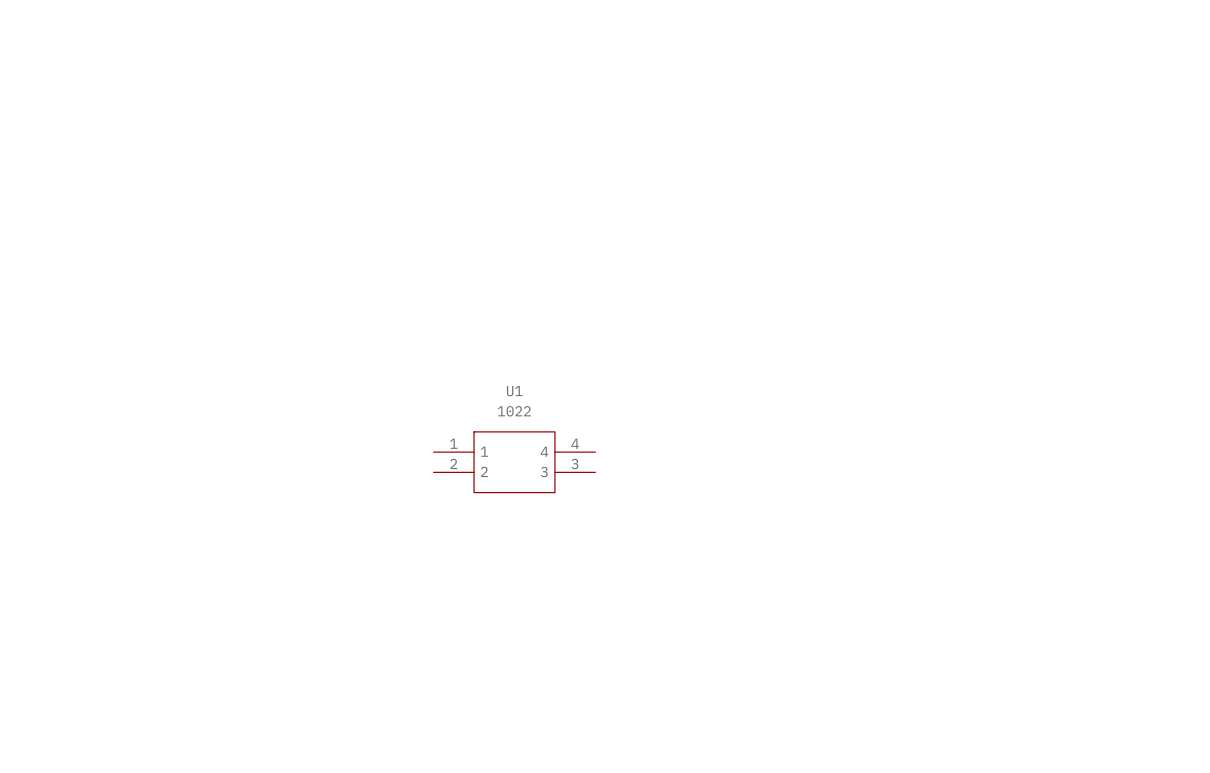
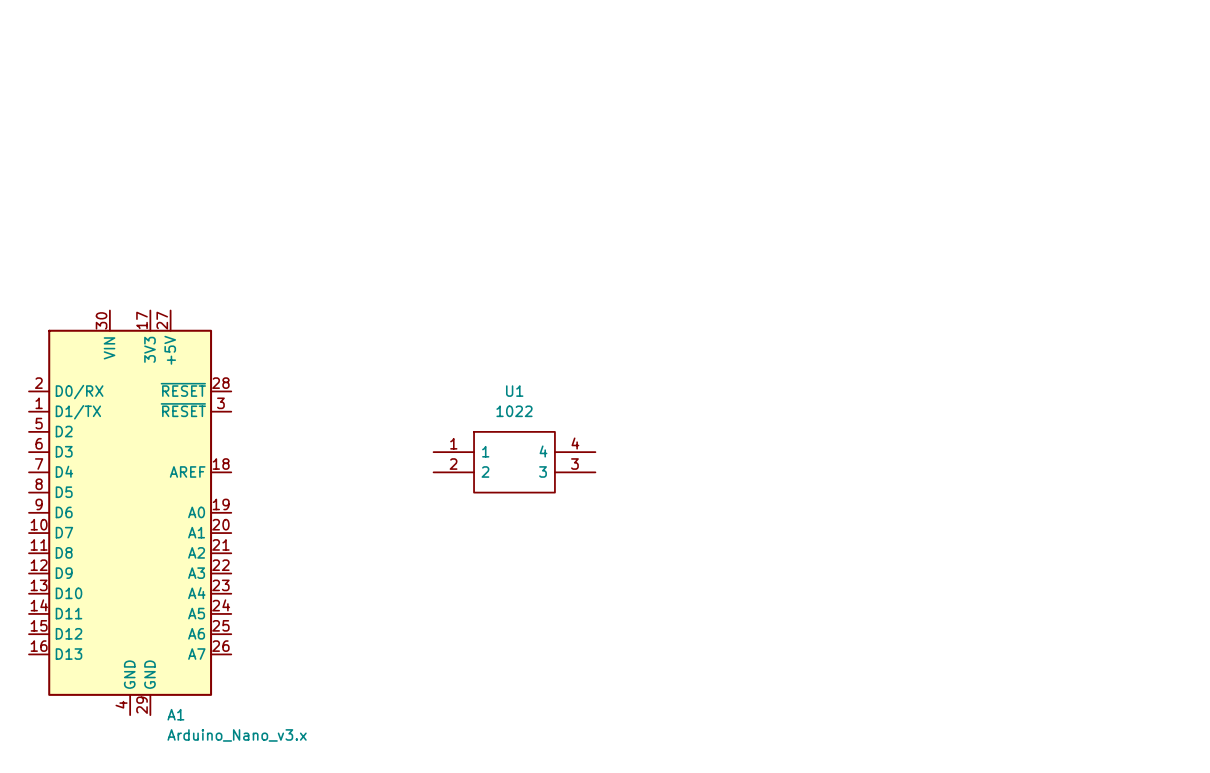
A1: none -> Arduino_Nano_v3.x (130, 512)

